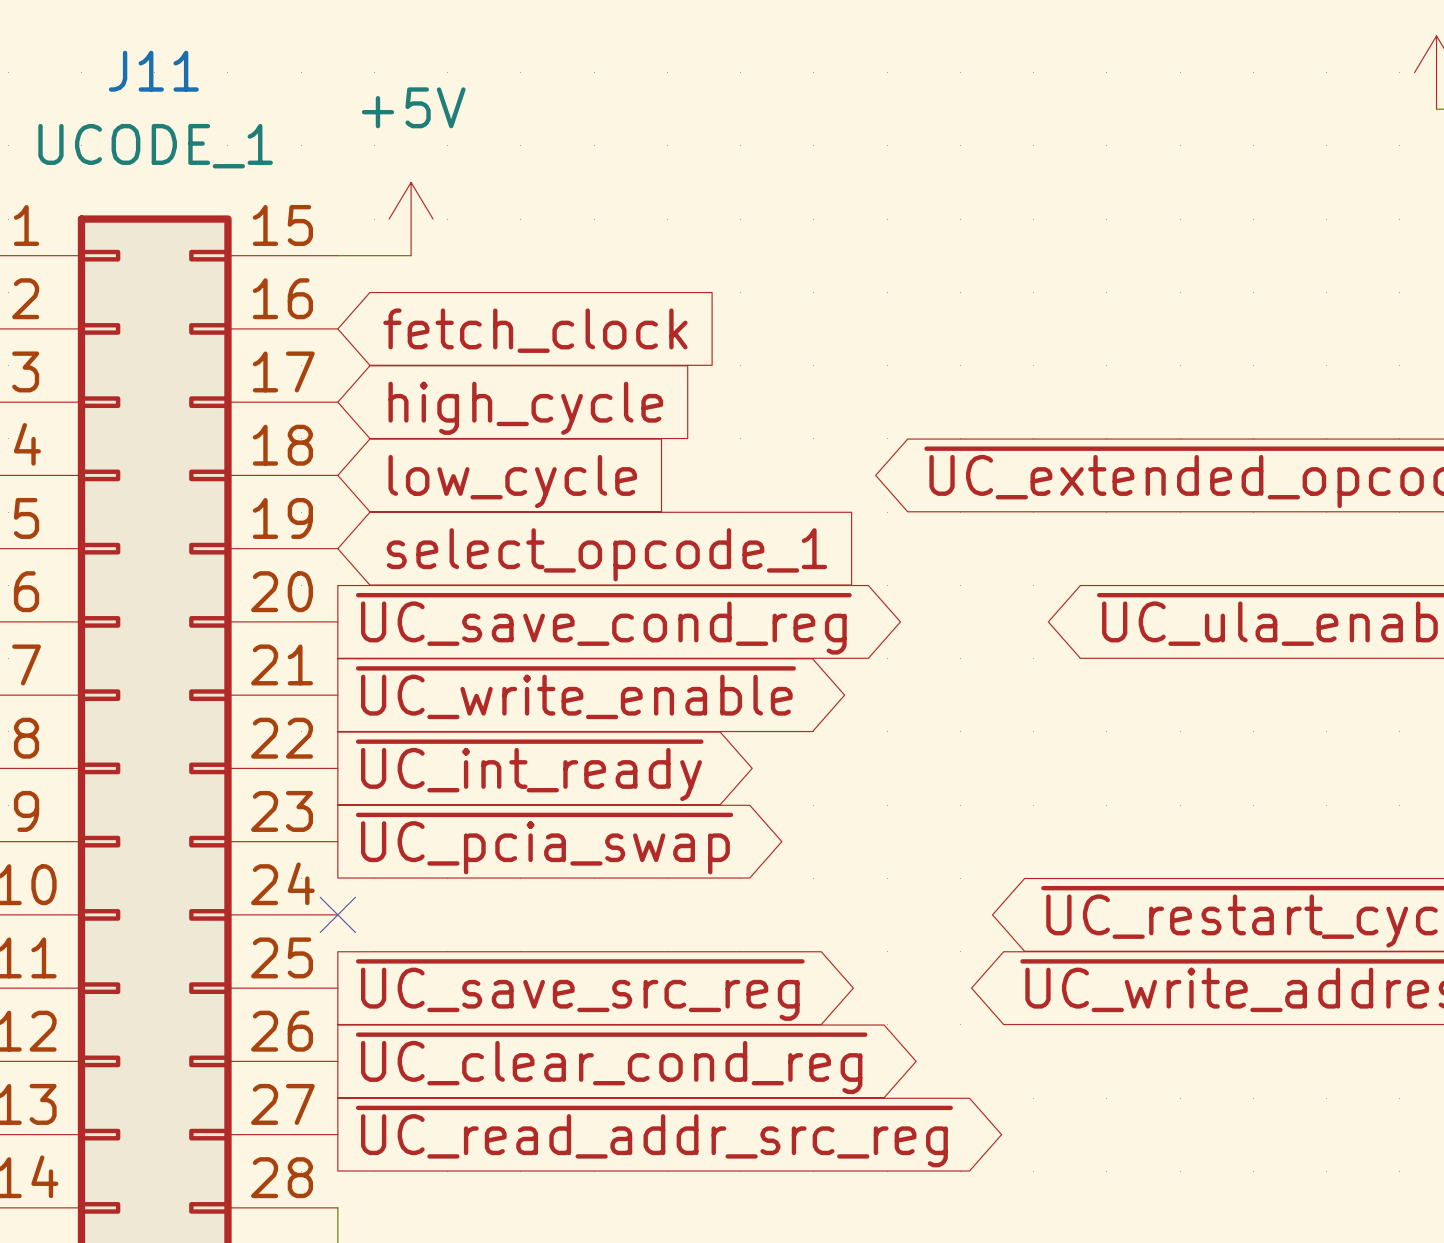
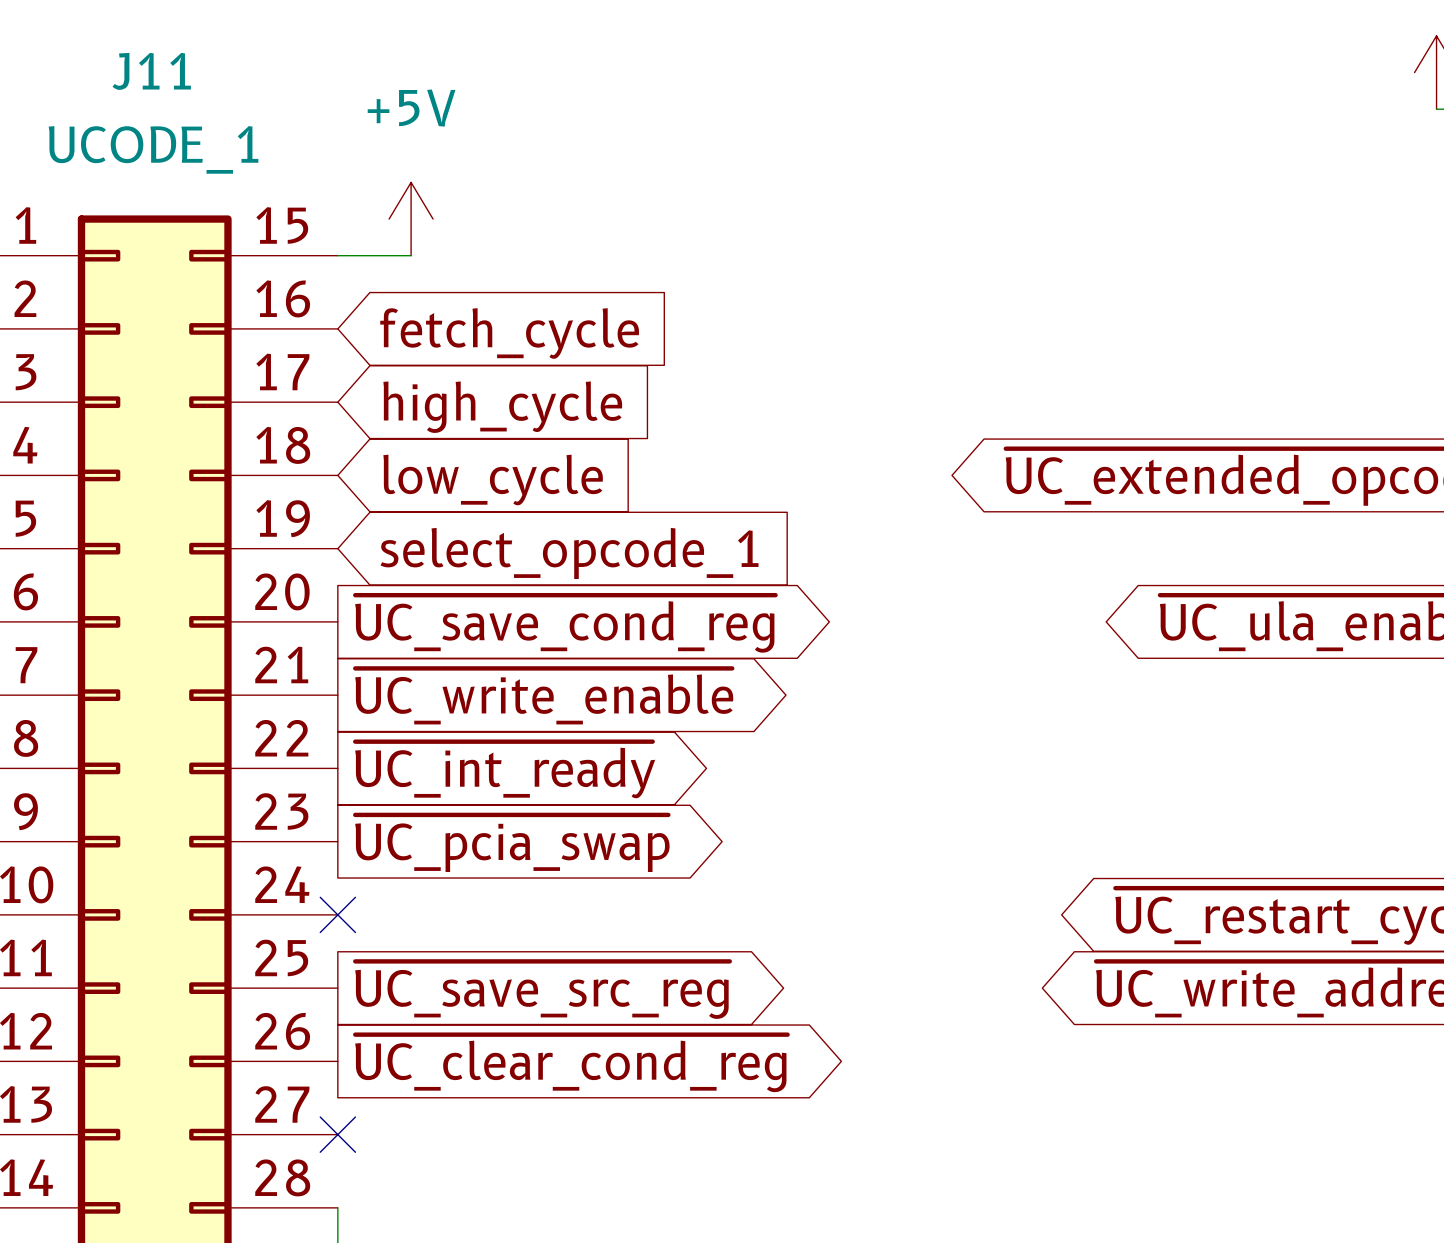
global label: fetch_clock (535, 330) -> fetch_cycle (509, 333)
no-connect mark: none -> (337, 1134)
global label: ~{UC_read_addr_src_reg} (654, 1136) -> none

